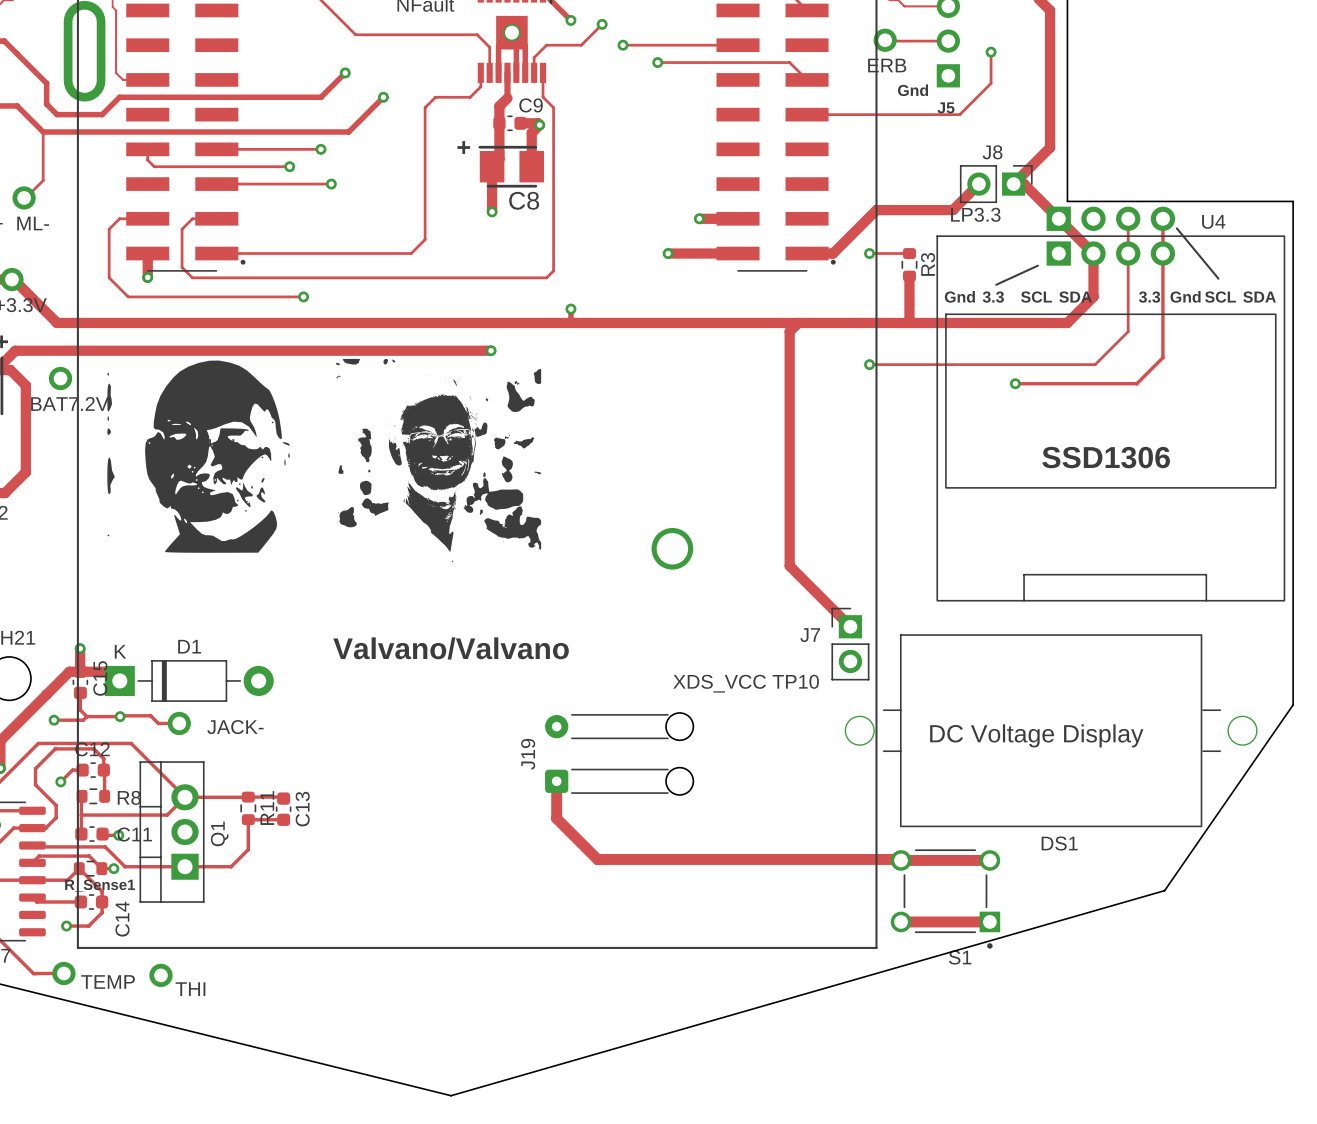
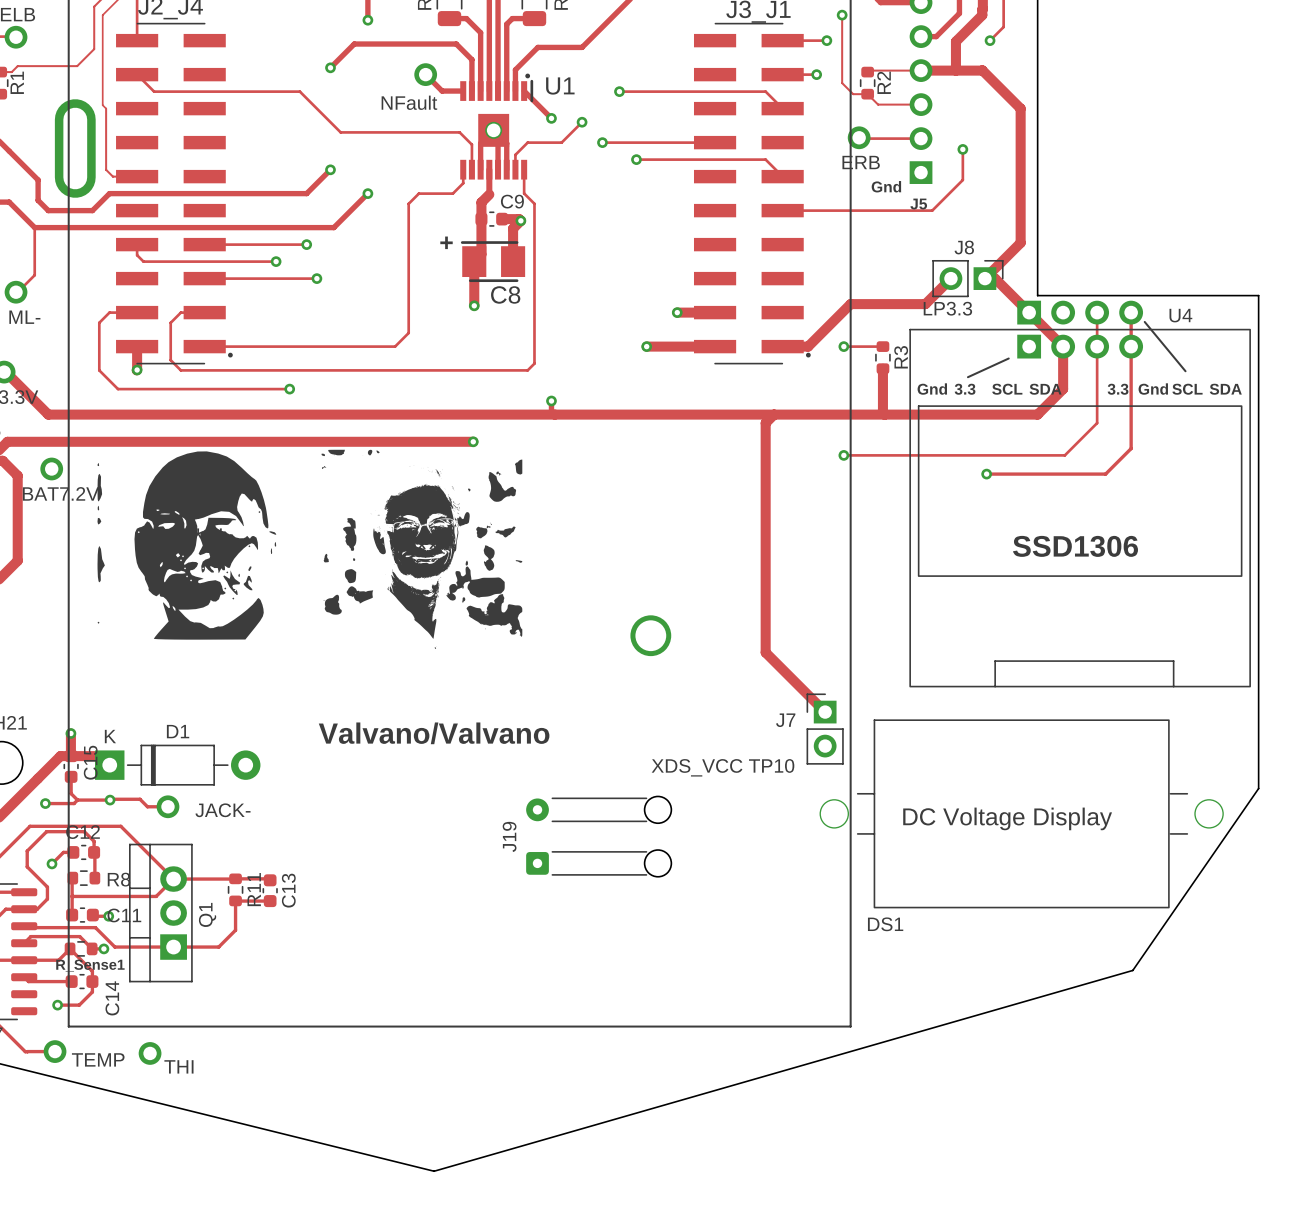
track: (556, 781) (556, 818) (597, 859) (989, 860) -> none
DS1 name position: DS1 (1059, 843) -> DS1 (885, 924)
S1: (945, 899) -> none
track: (901, 921) (989, 921) -> none

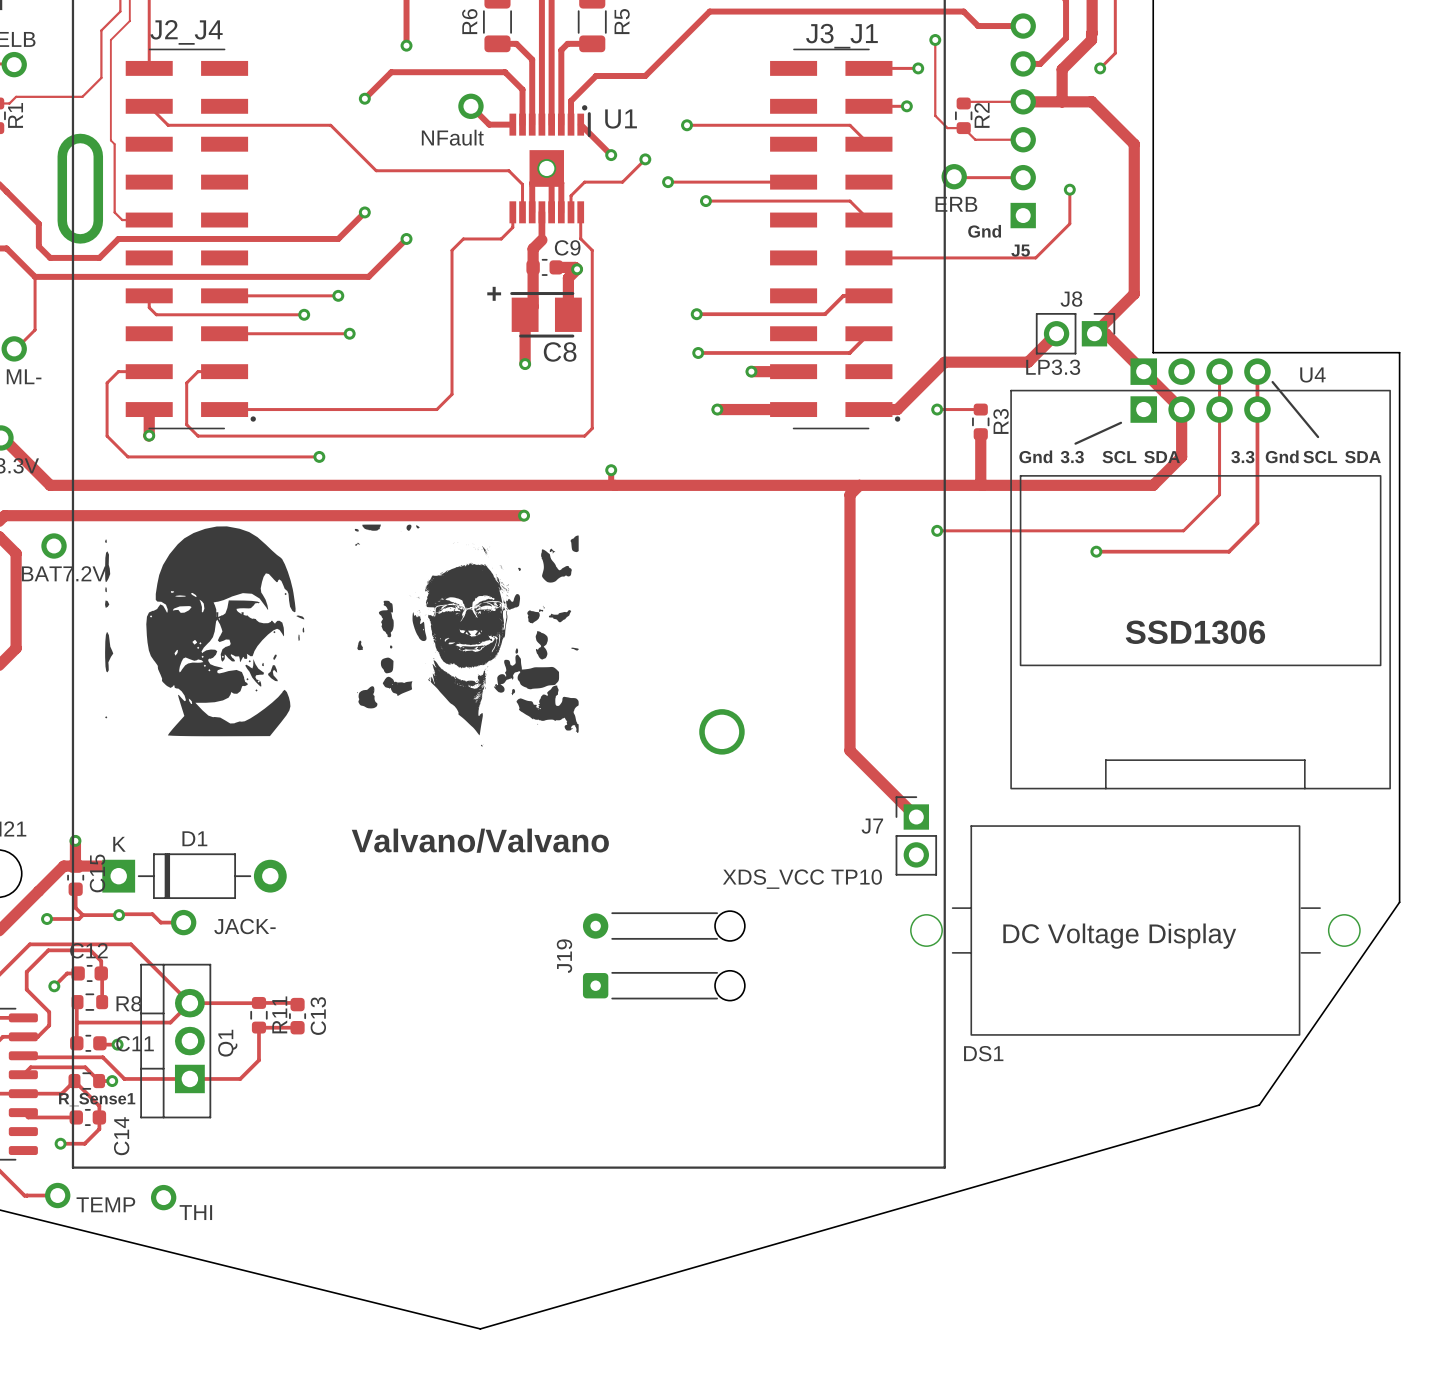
track: none -> (868, 295) (843, 295) (825, 314) (696, 314)
via: none -> (696, 314)
track: none -> (868, 333) (849, 352) (698, 352)
via: none -> (698, 352)

